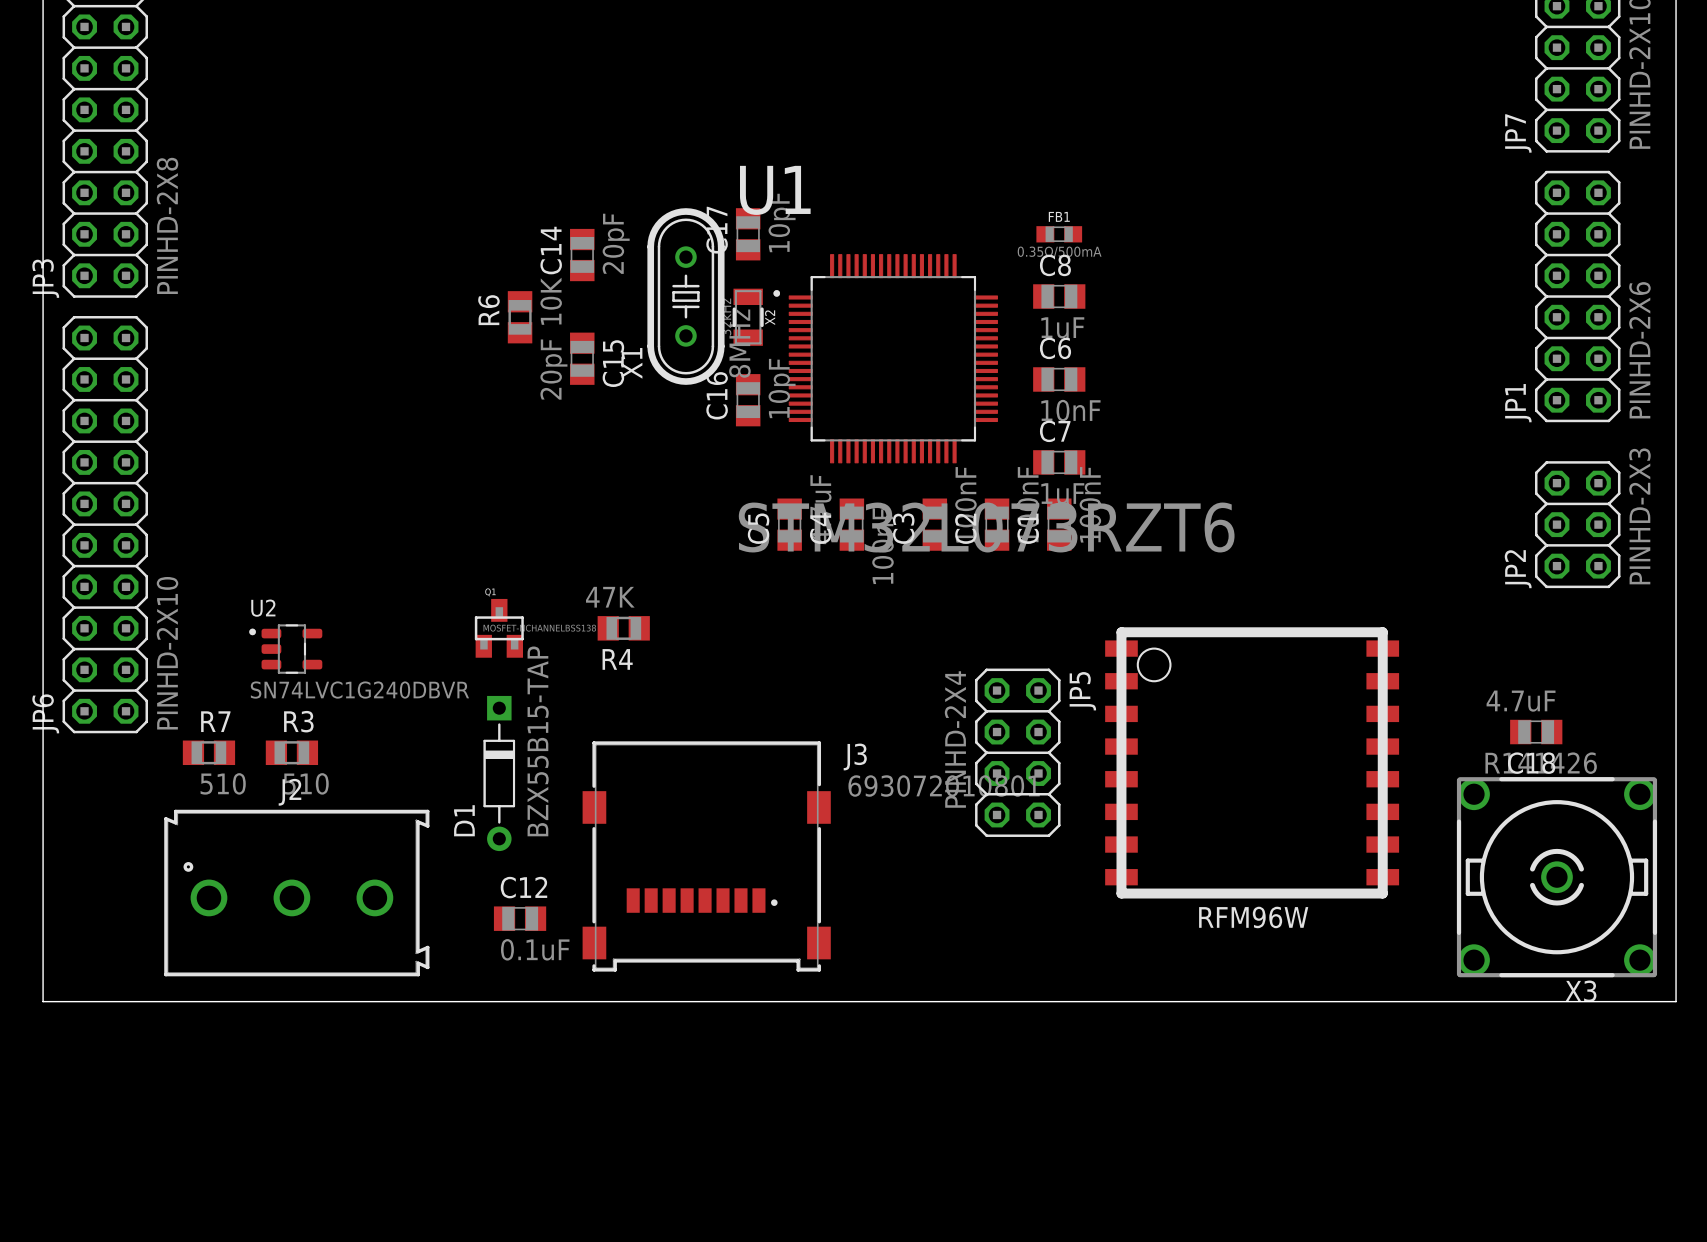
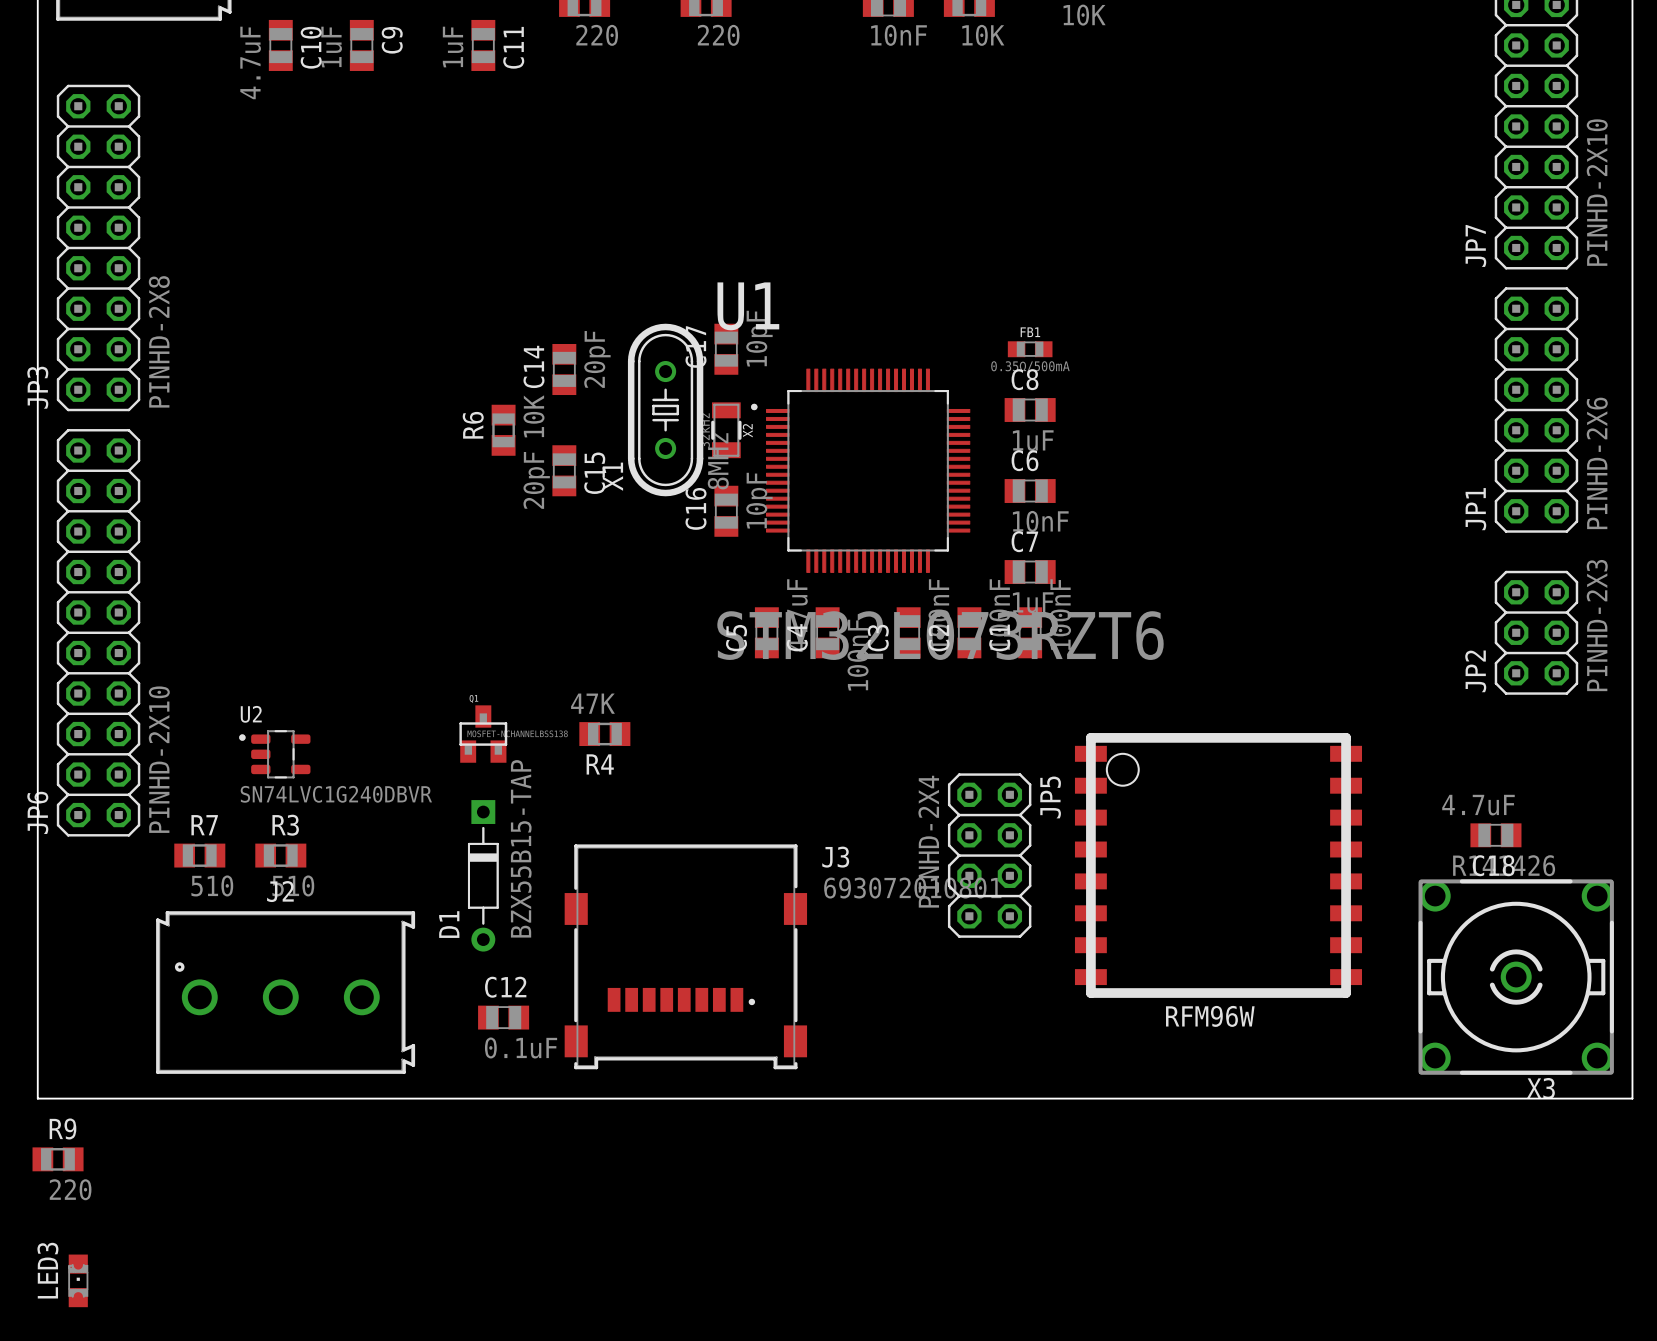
R9: none -> 220 (58, 1159)
LED3: none -> (78, 1280)

